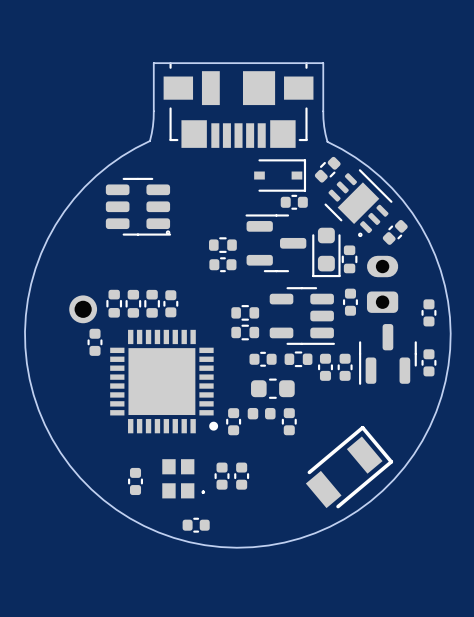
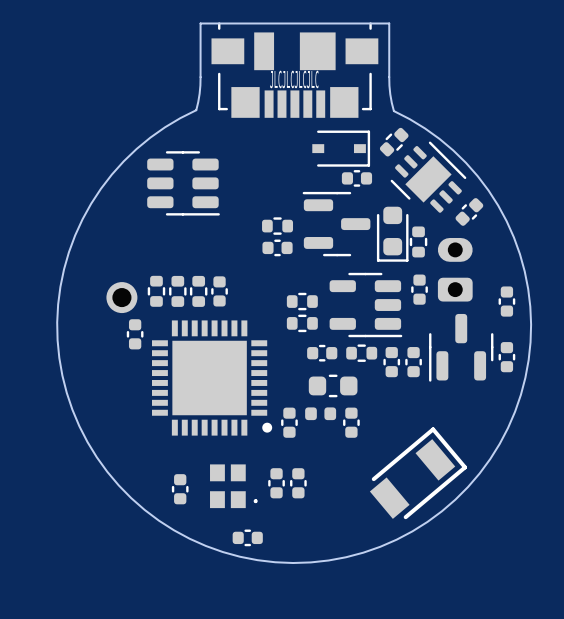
text: none -> JLCJLCJLCJLC (294, 79)
drawing: [165, 230, 171, 235] -> none
drawing: [358, 232, 363, 238] -> none

